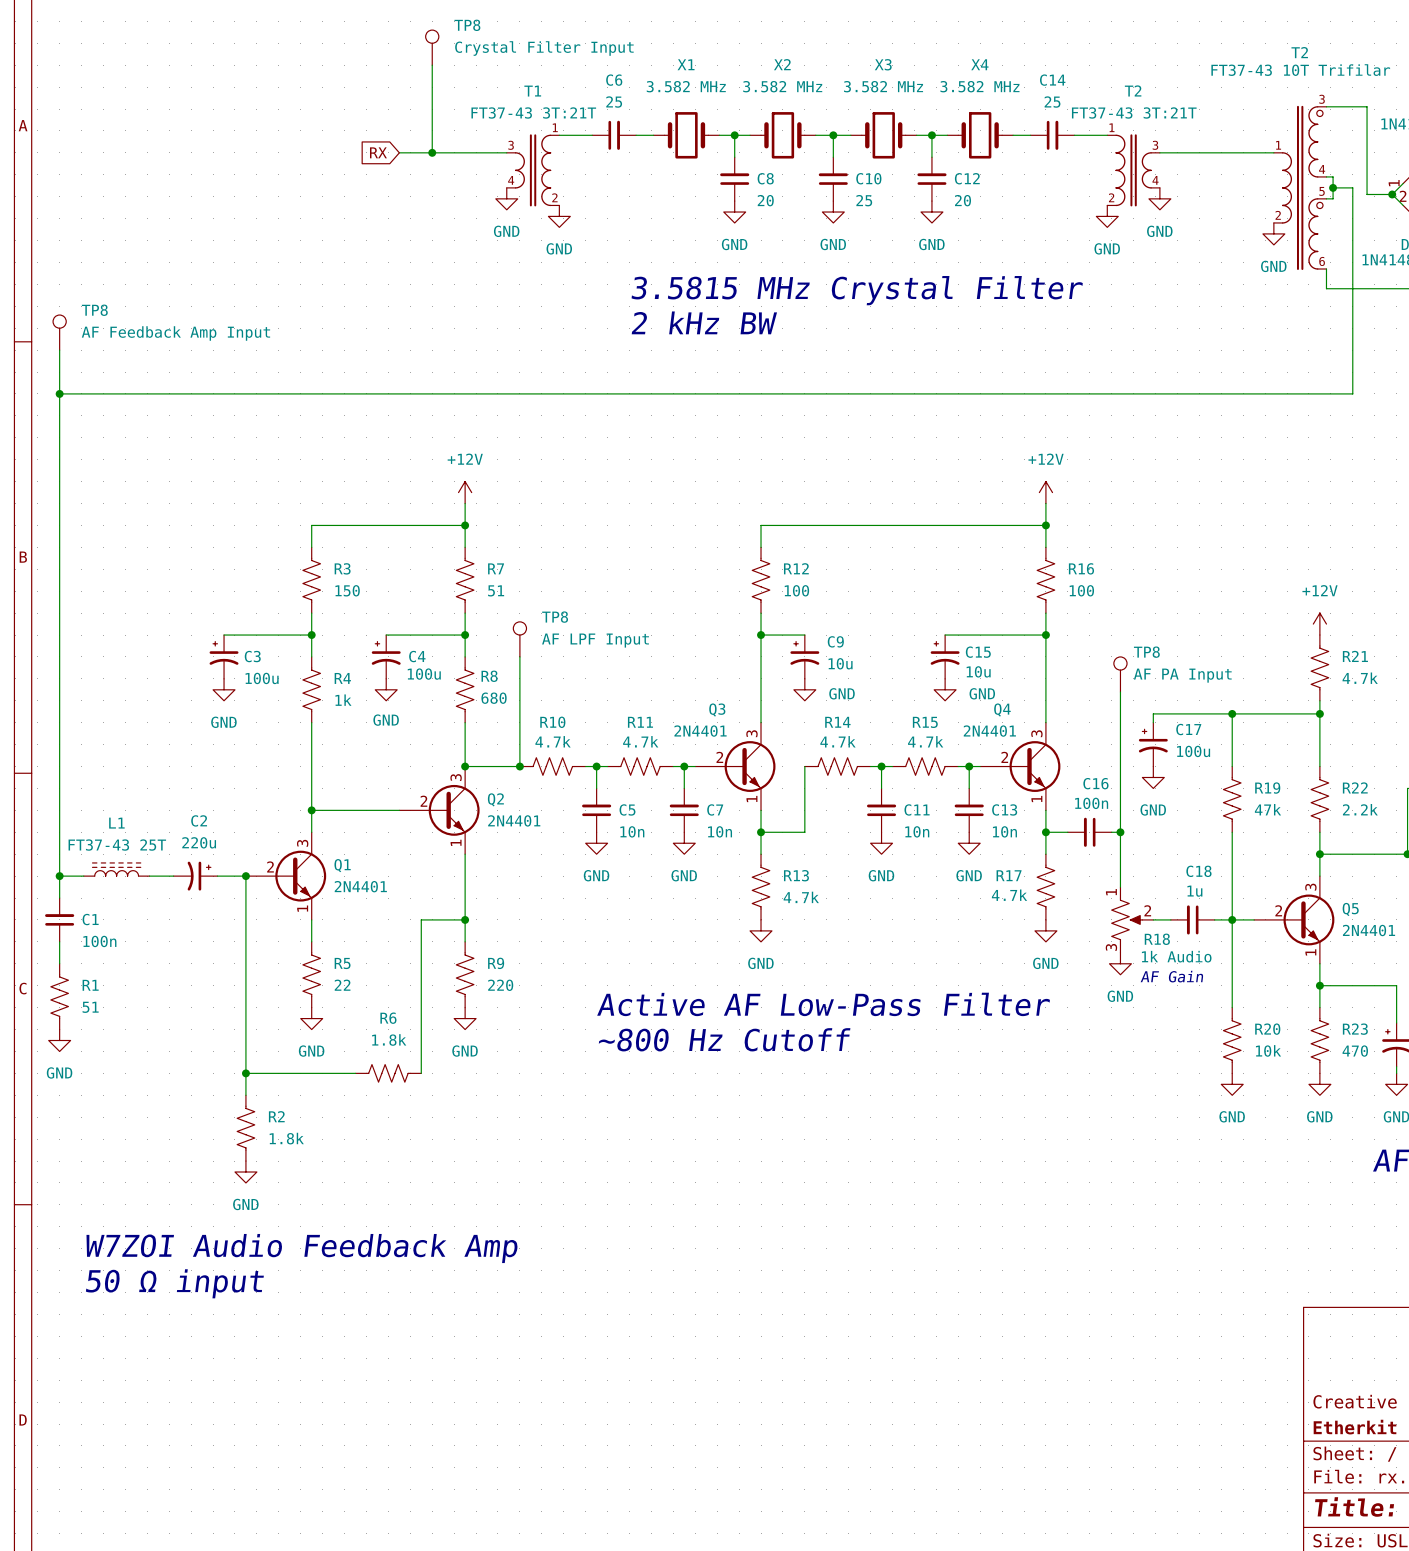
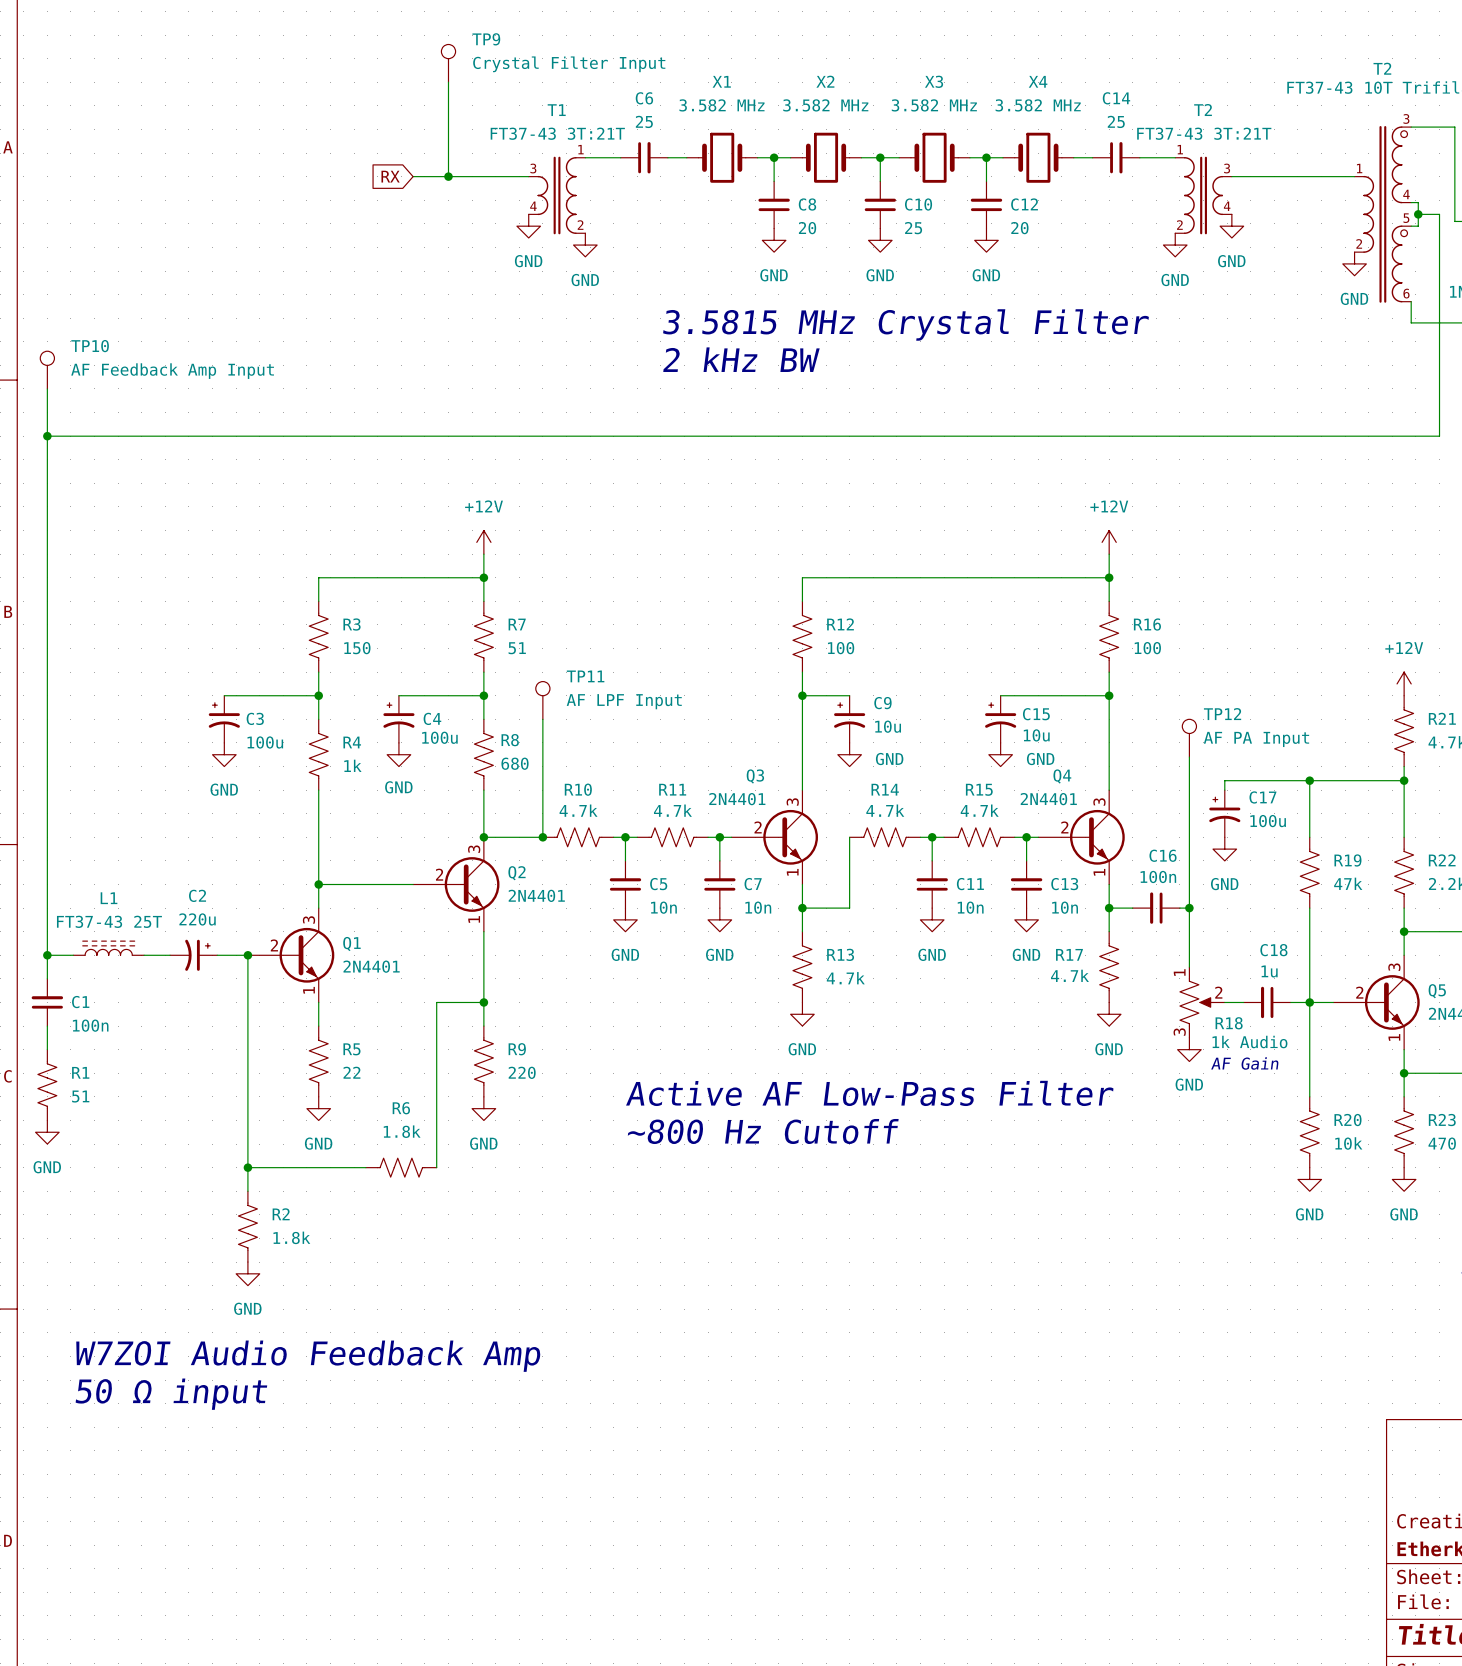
TP8 name: TP8 (467, 25) -> TP9 (486, 39)
TP8 name: TP8 (94, 310) -> TP10 (90, 346)
TP8 name: TP8 (555, 617) -> TP11 (585, 676)
TP8 name: TP8 (1146, 652) -> TP12 (1222, 714)

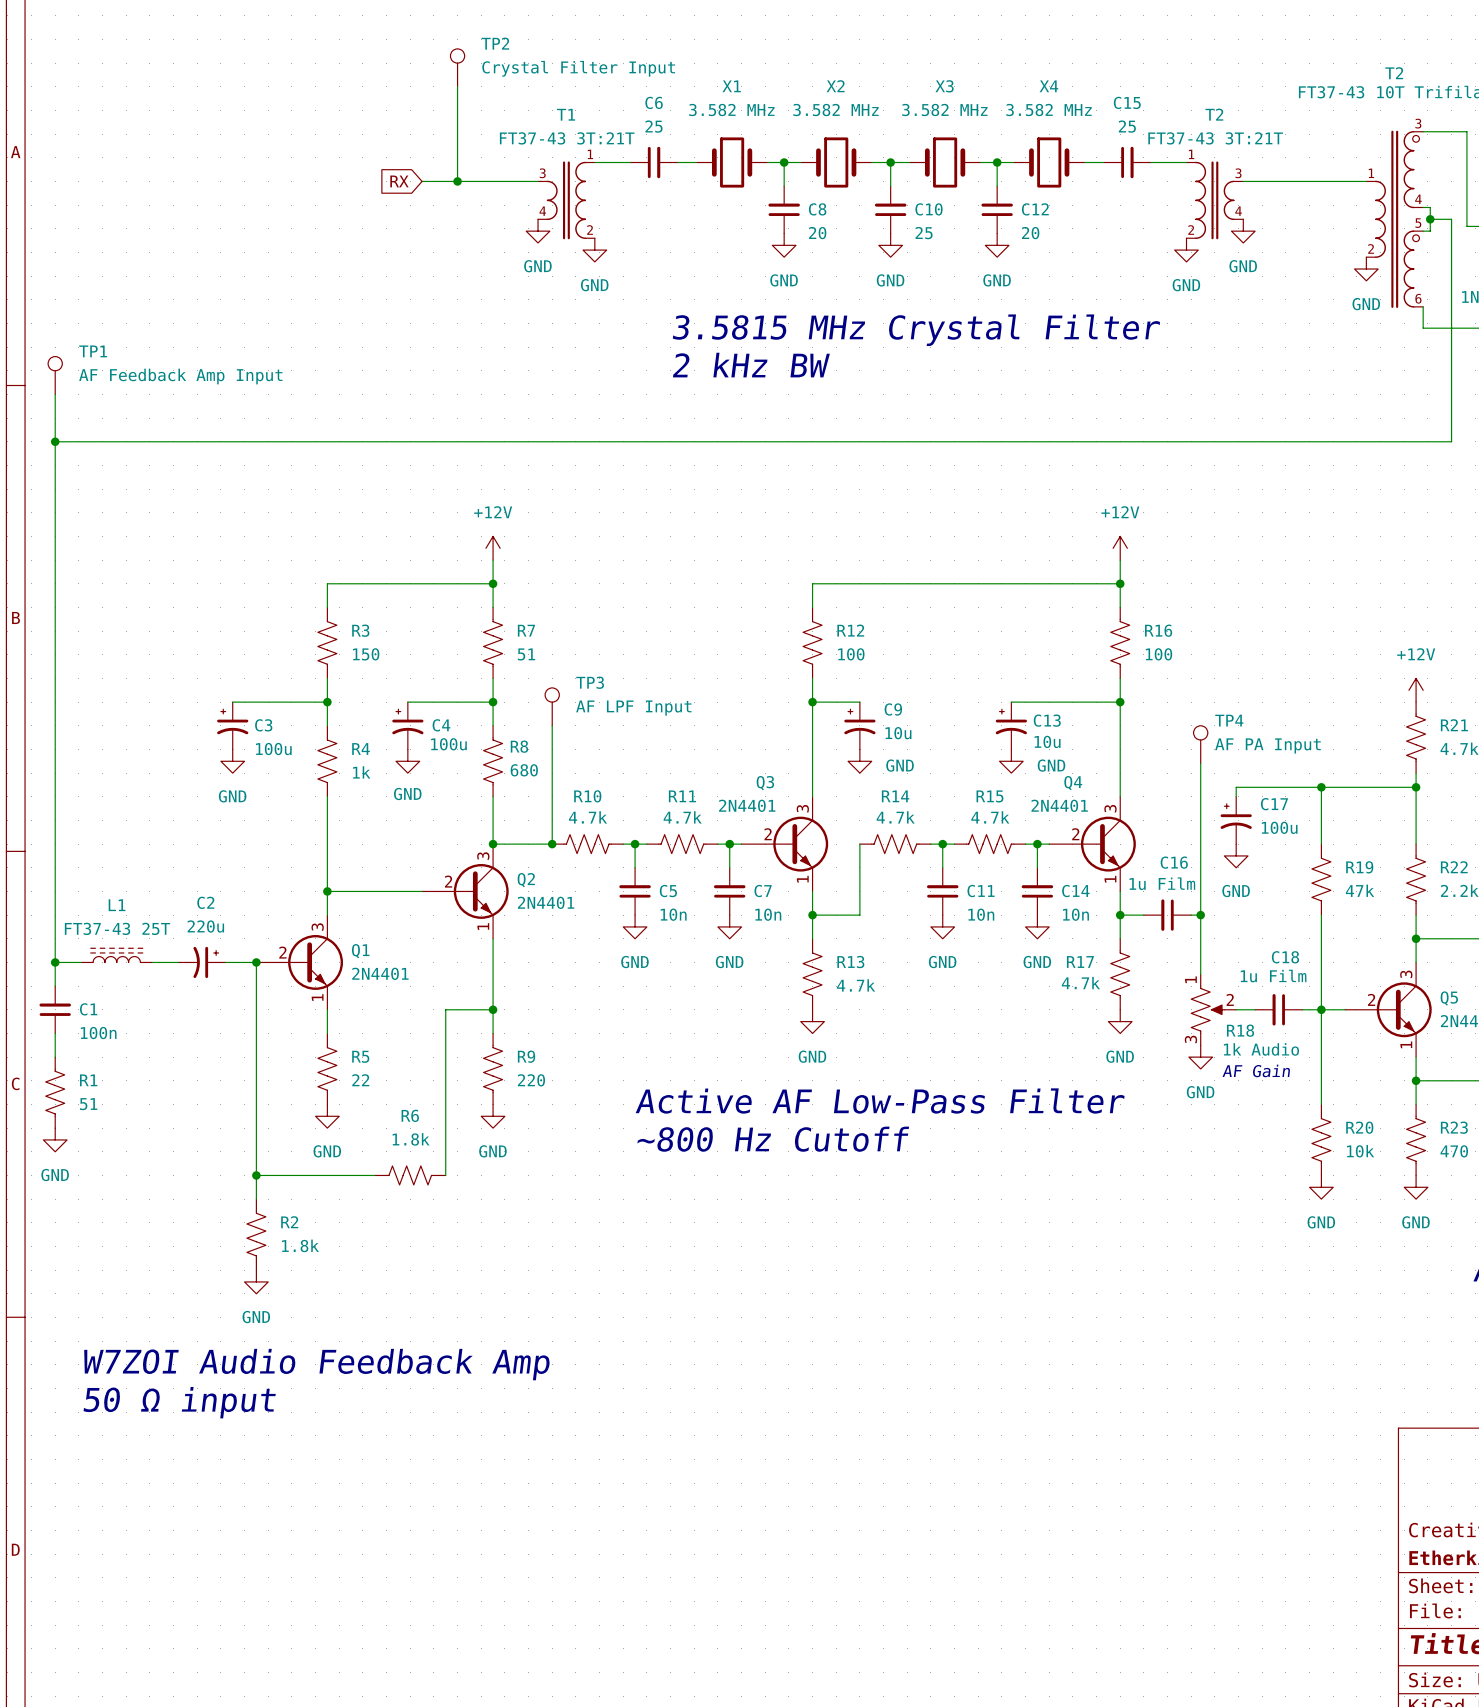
TP9 name: TP9 (486, 39) -> TP2 (495, 43)
C14 name: C14 (1116, 98) -> C15 (1127, 102)
TP10 name: TP10 (90, 346) -> TP1 (93, 351)
TP11 name: TP11 (585, 676) -> TP3 (590, 682)
C15 name: C15 (1036, 714) -> C13 (1047, 720)
TP12 name: TP12 (1222, 714) -> TP4 (1229, 720)
C16 value: 100n (1158, 876) -> 1u Film (1162, 883)
C13 name: C13 (1064, 884) -> C14 (1075, 891)
C18 value: 1u (1269, 971) -> 1u Film (1273, 976)

